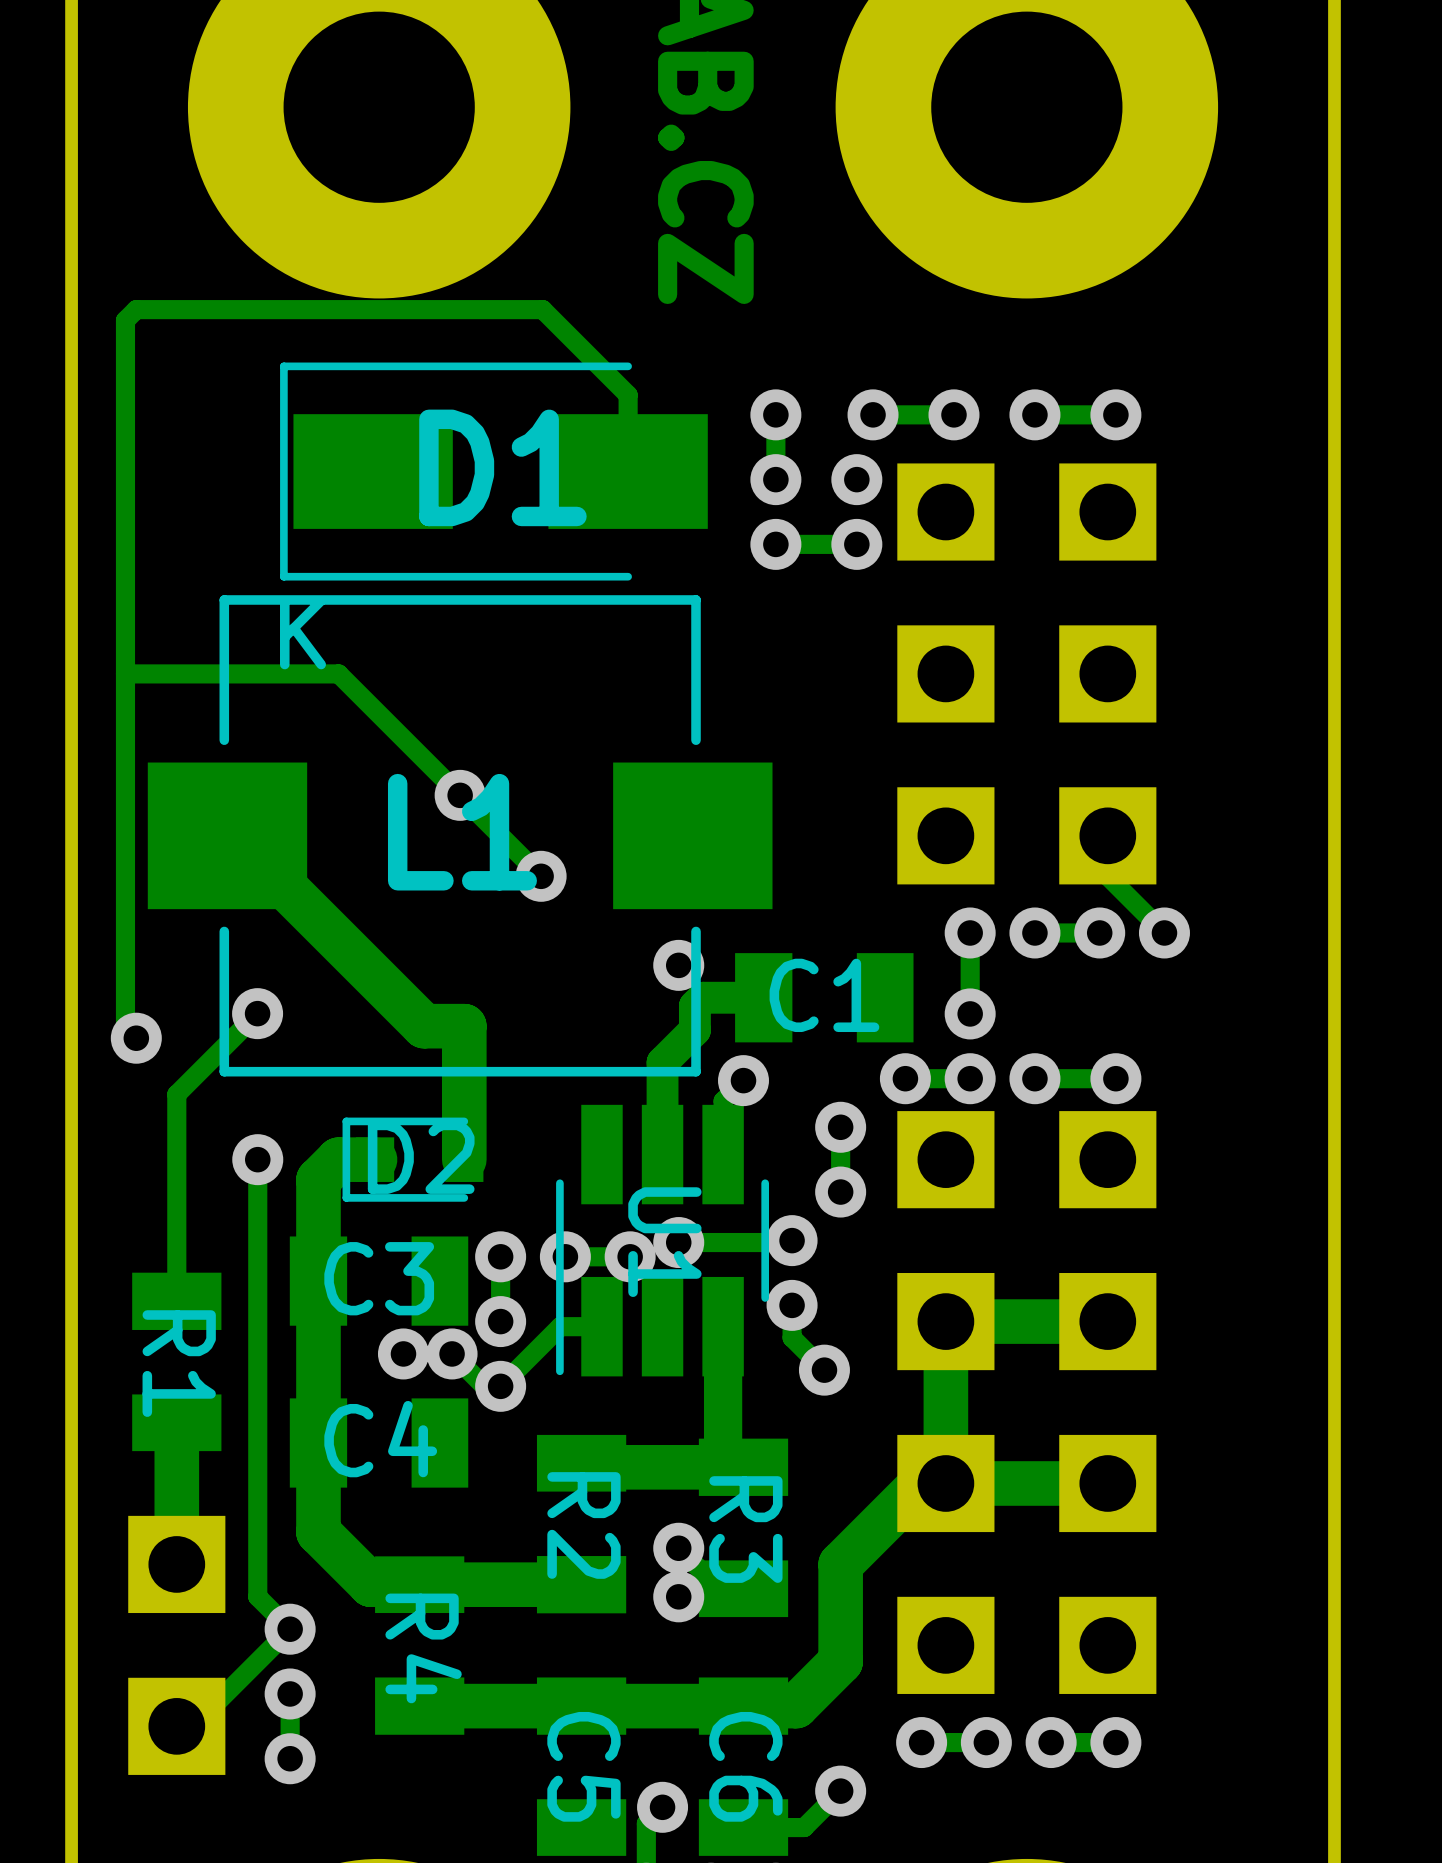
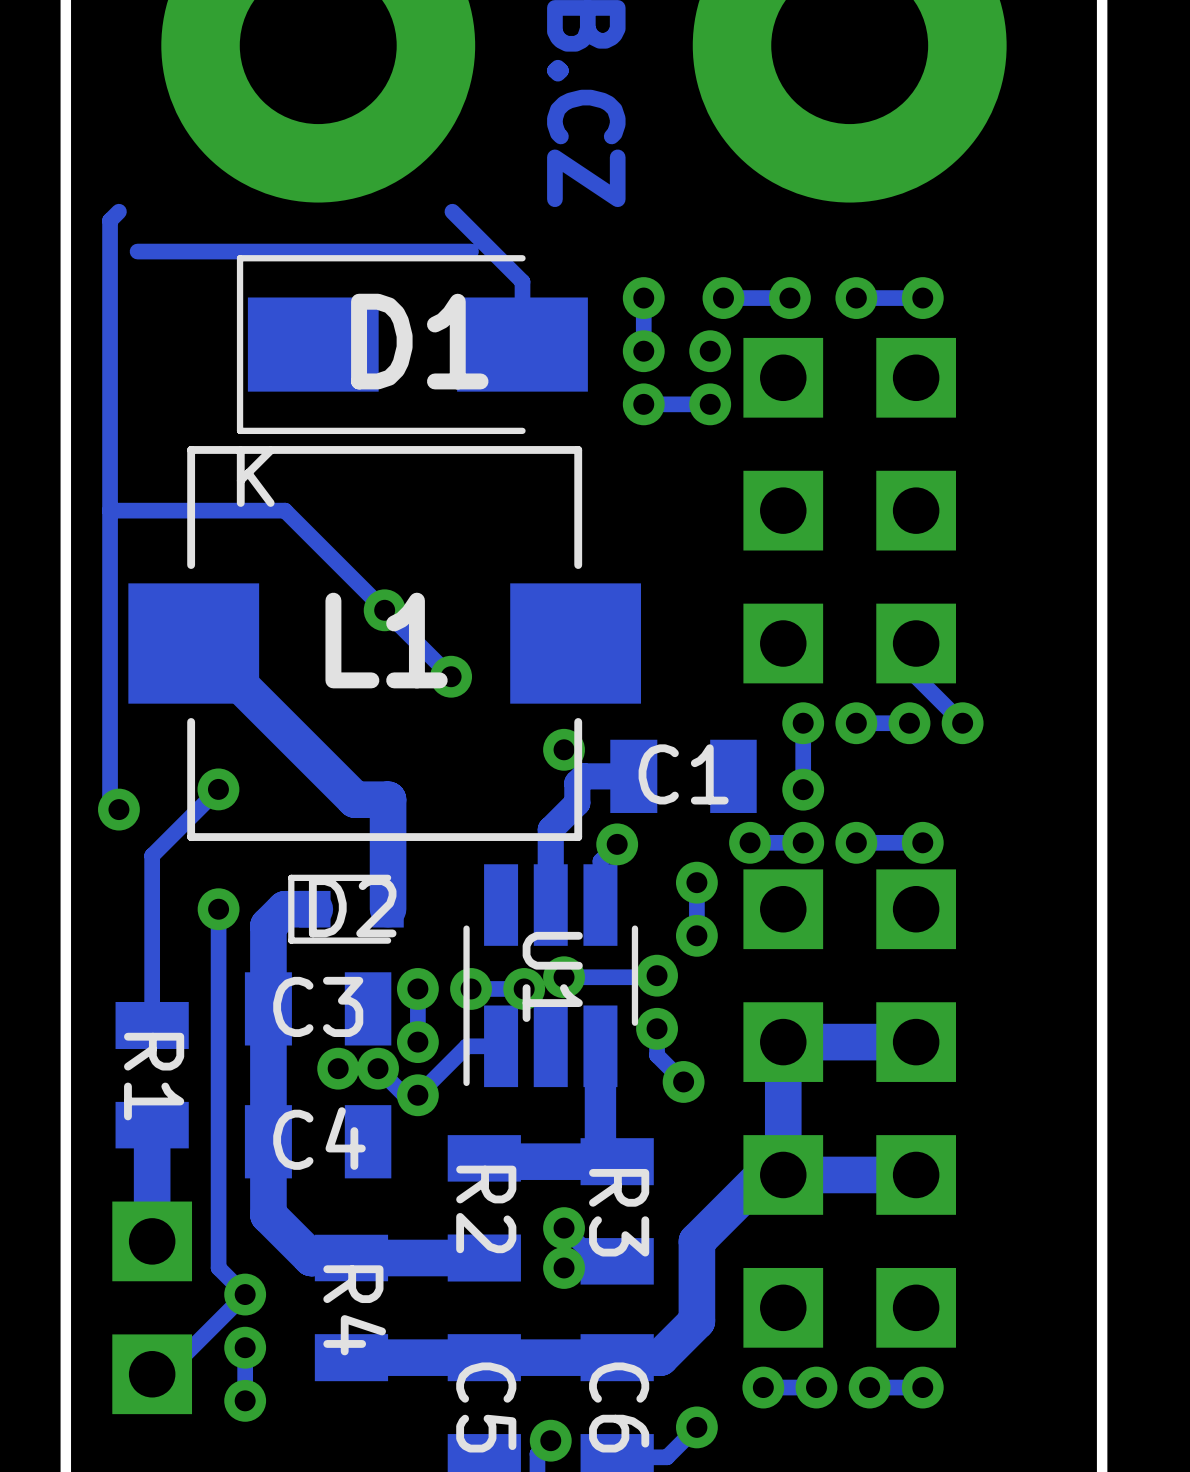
track: (542, 309) (136, 309) -> (471, 251) (137, 251)

